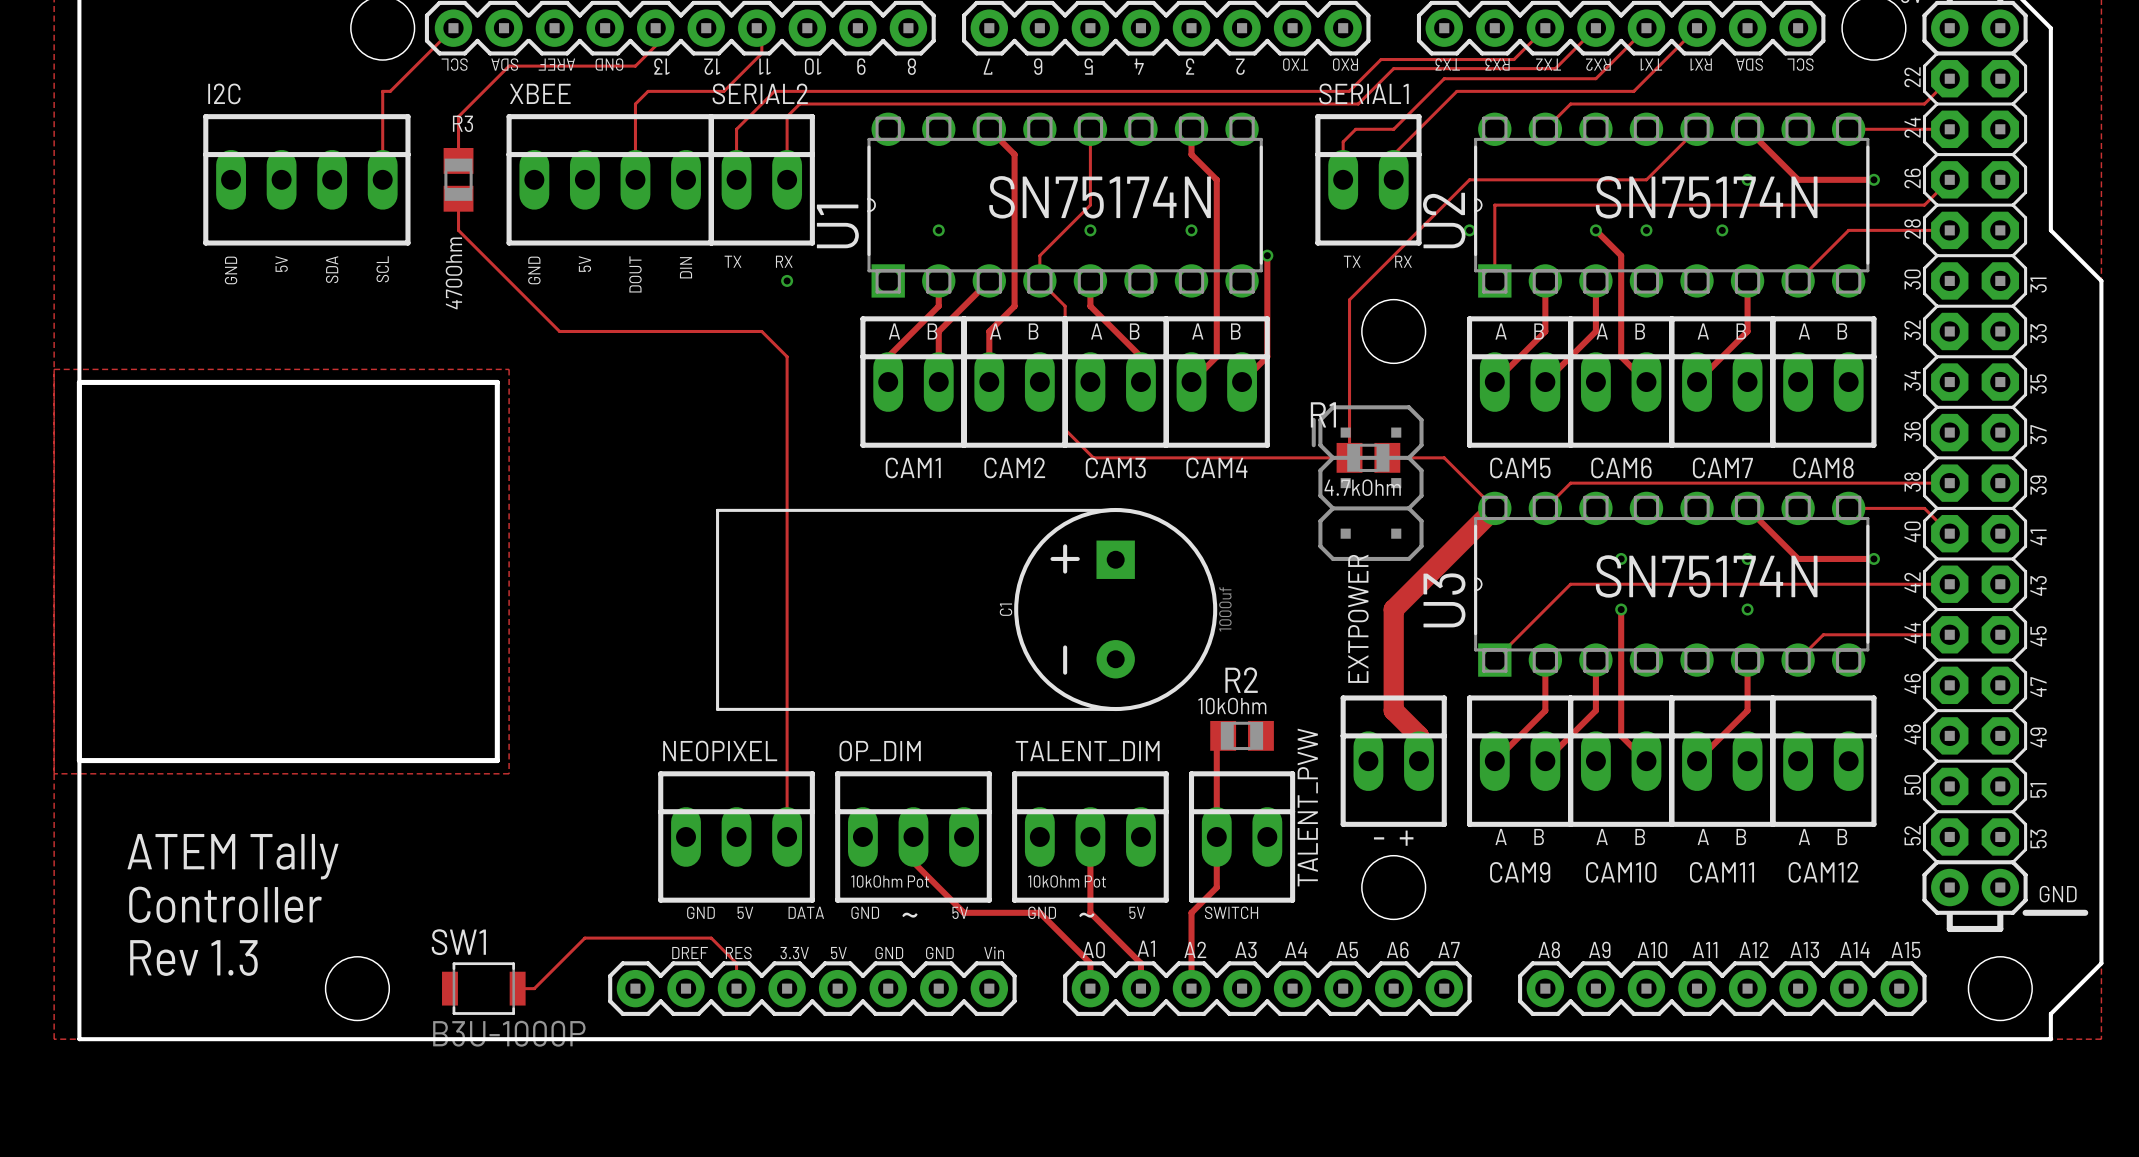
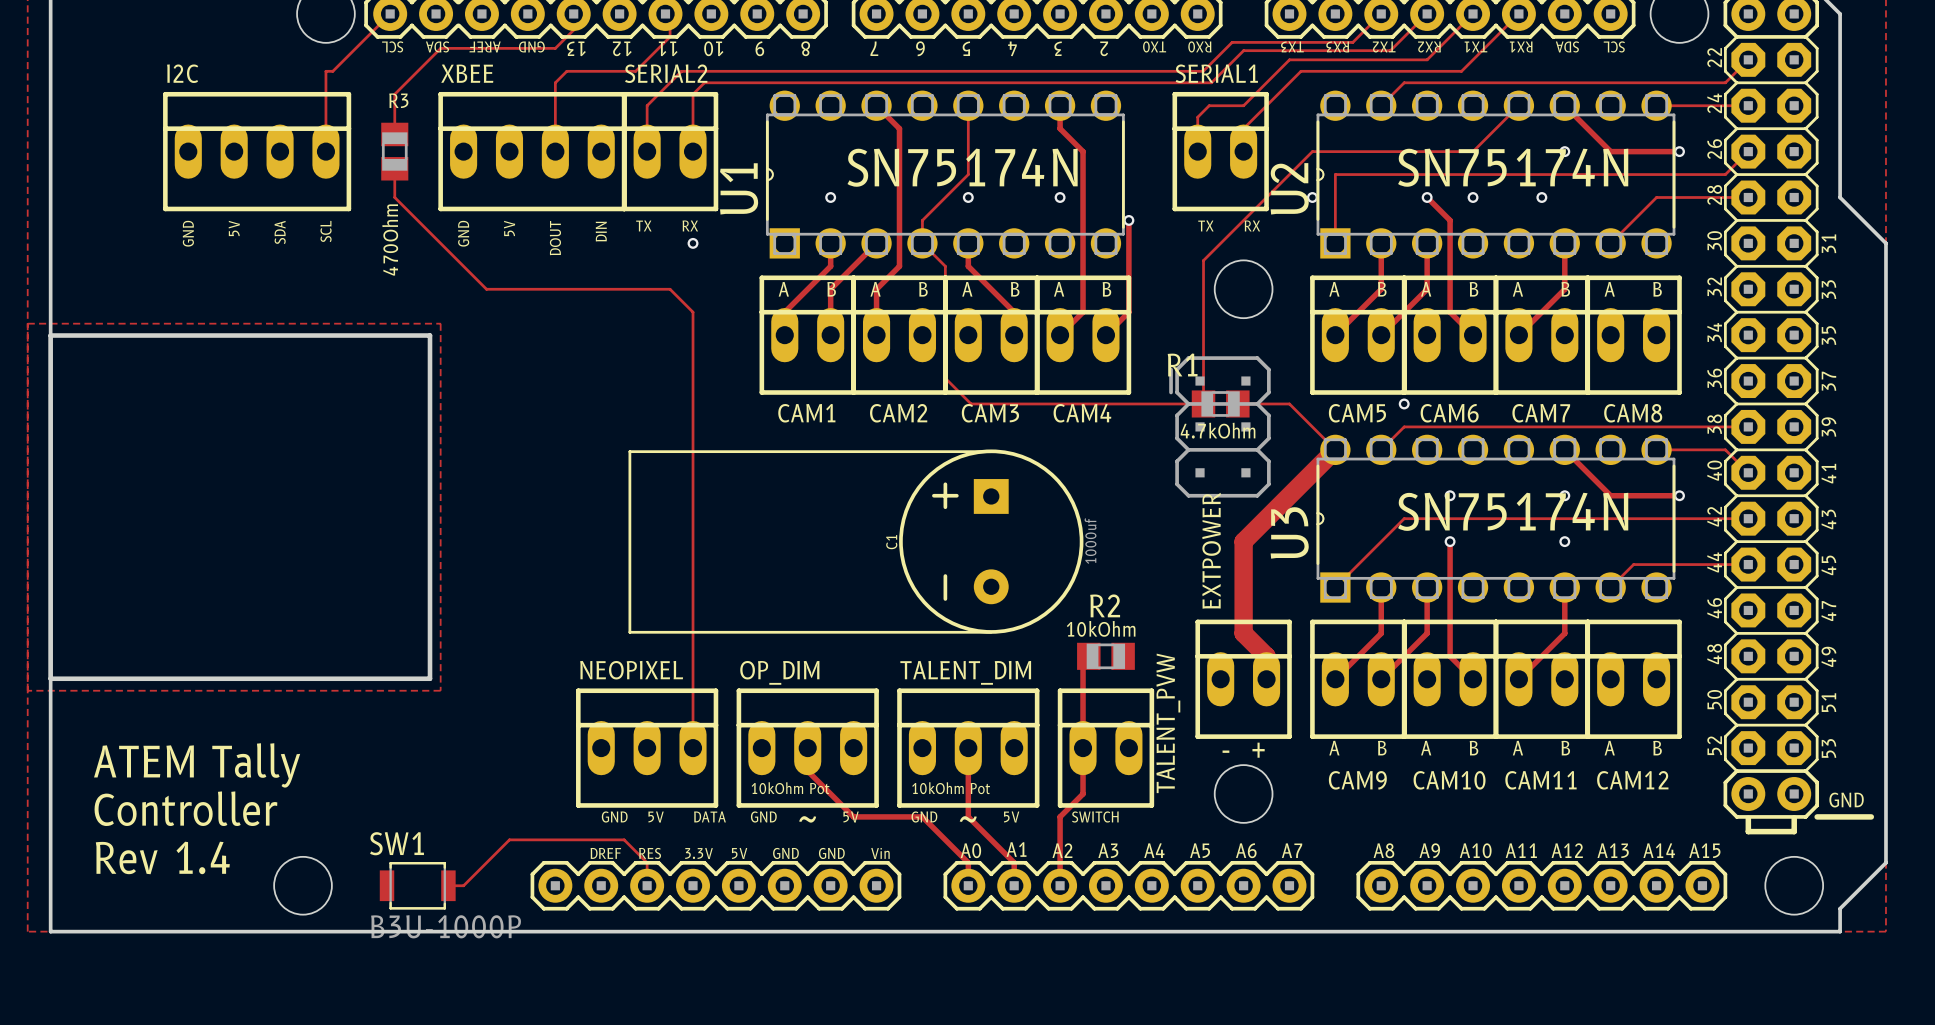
via: none -> (1404, 403)
text: Rev 1.3 (193, 958) -> Rev 1.4 (162, 857)

